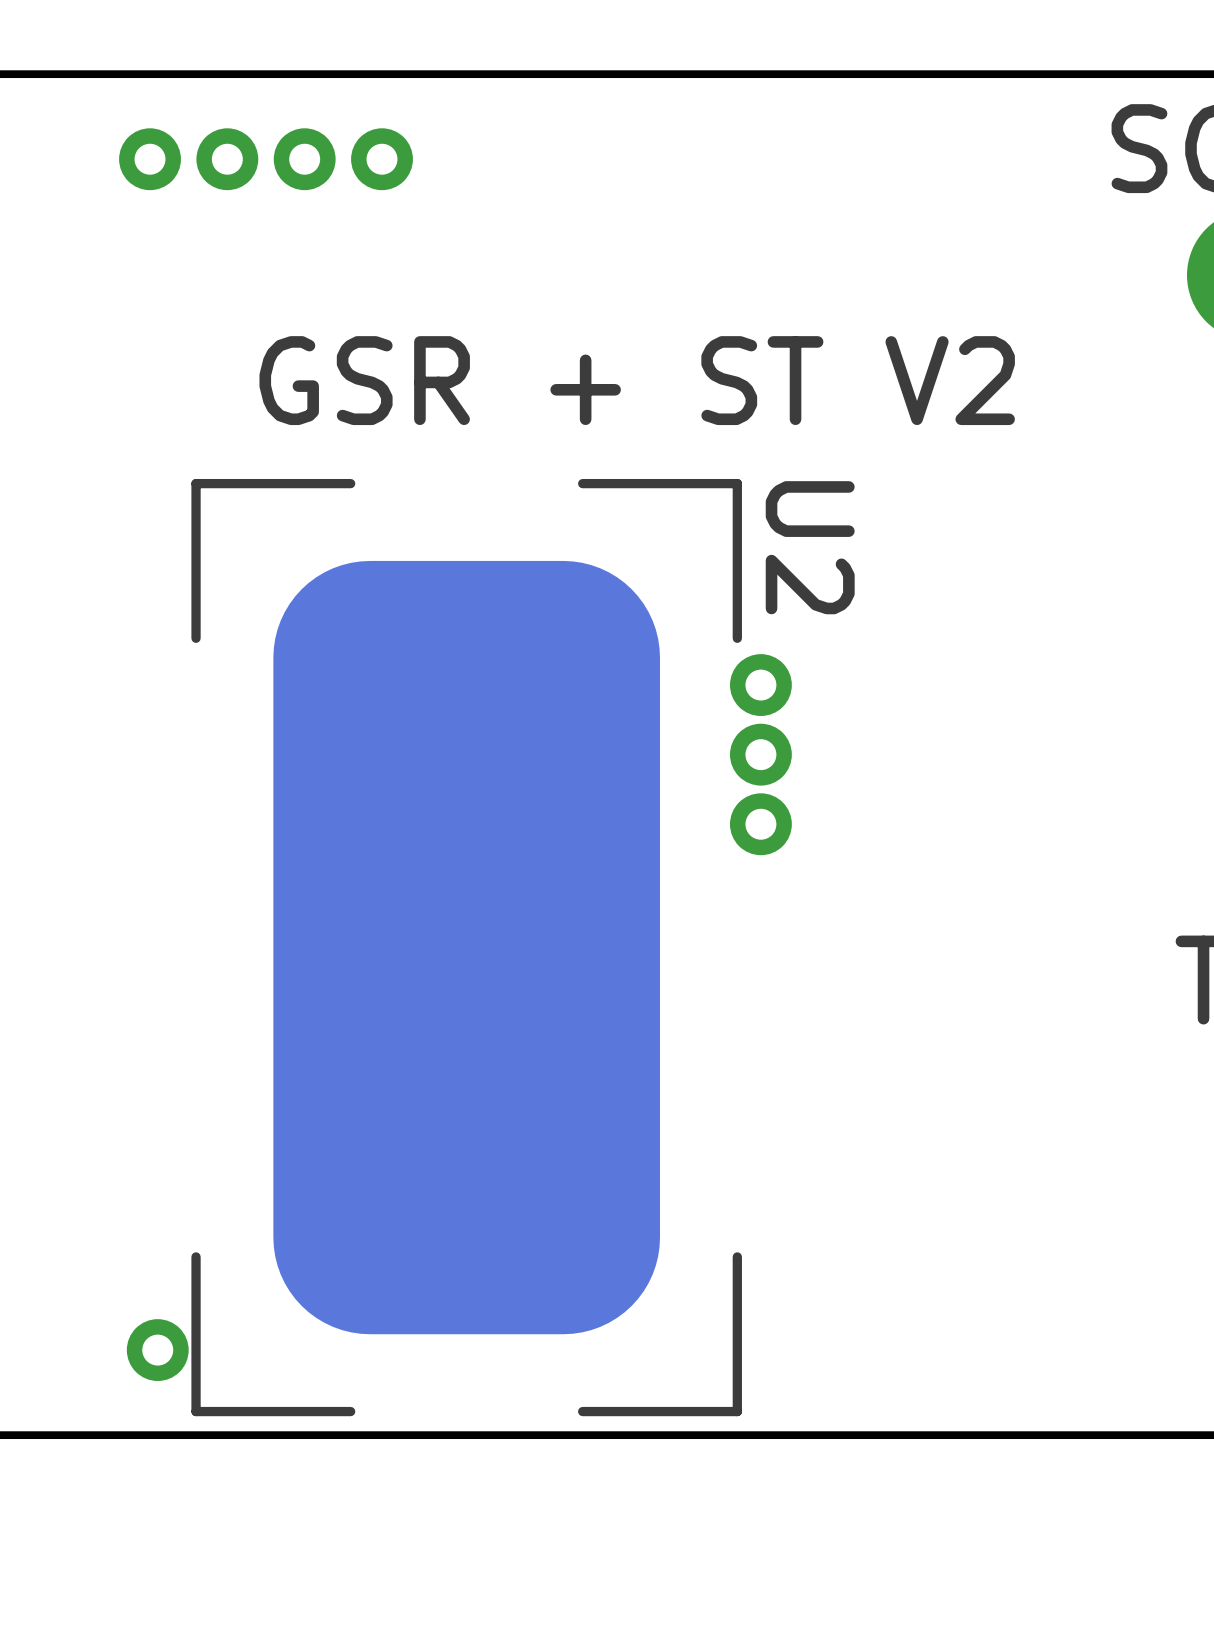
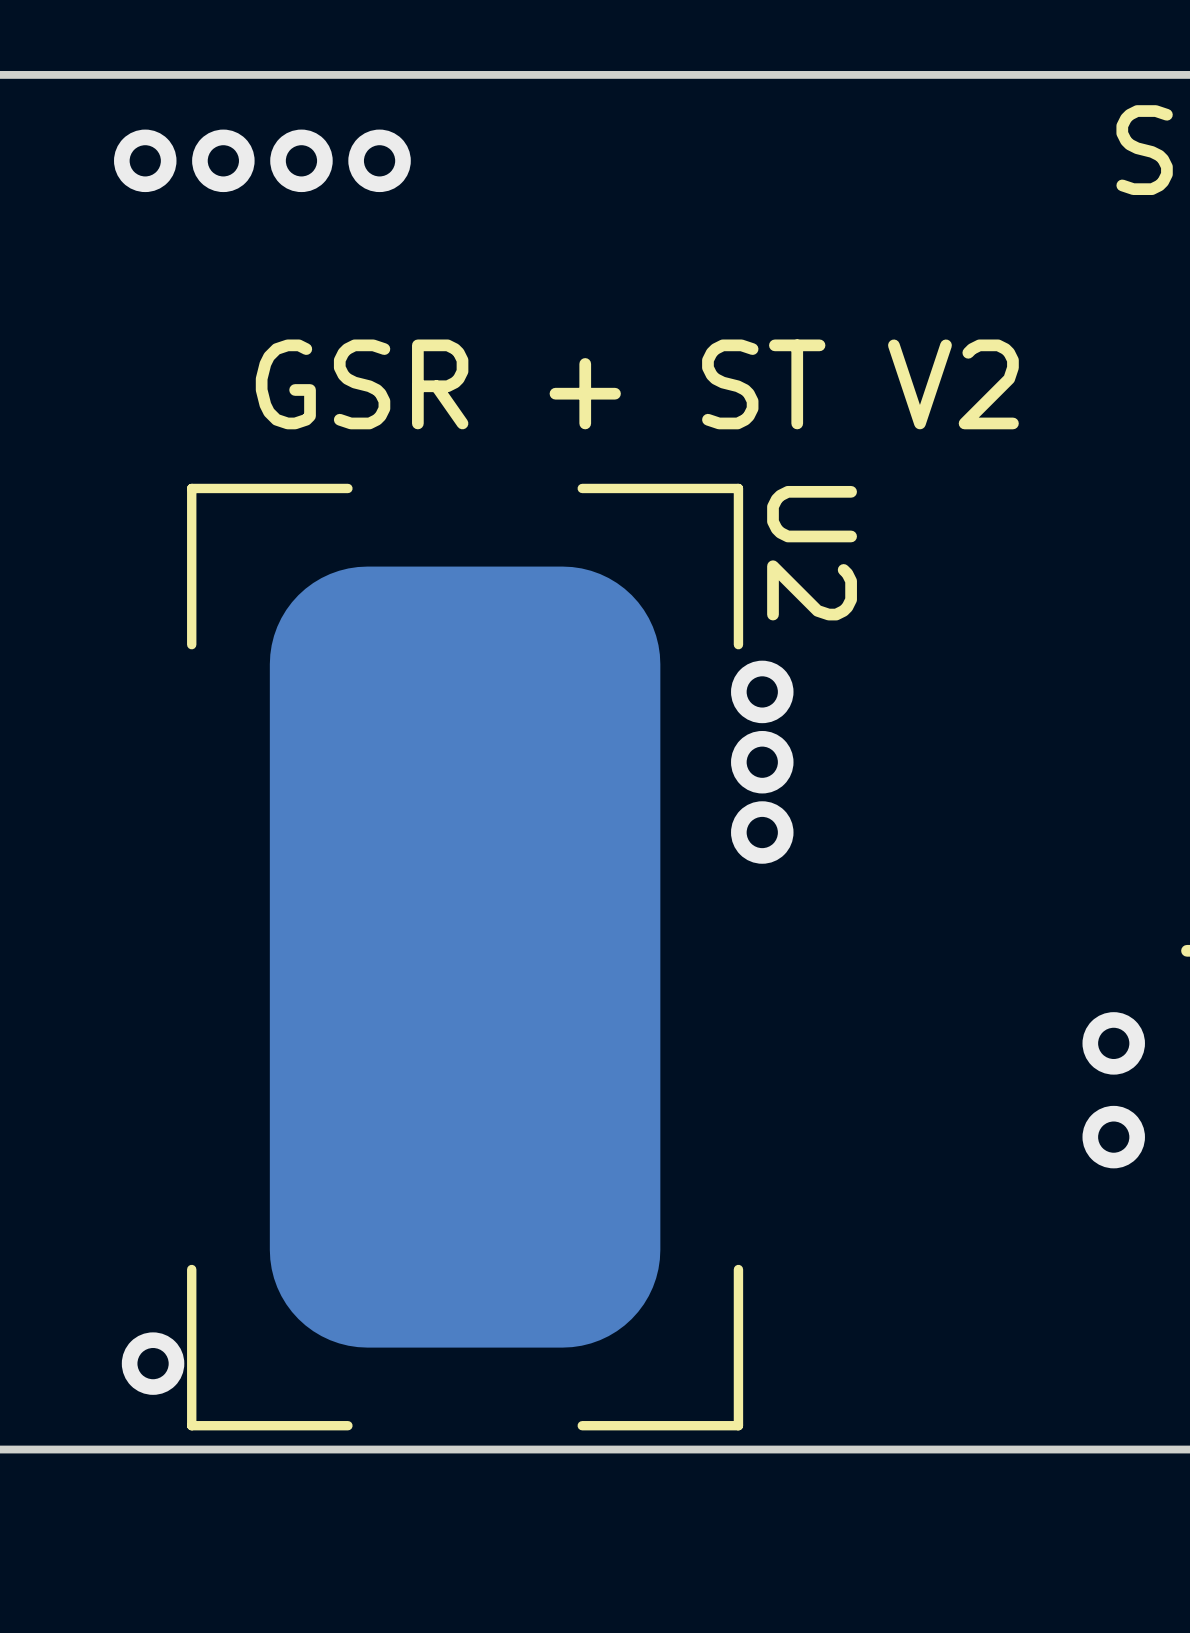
via: none -> (1113, 1043)
via: none -> (1113, 1137)

